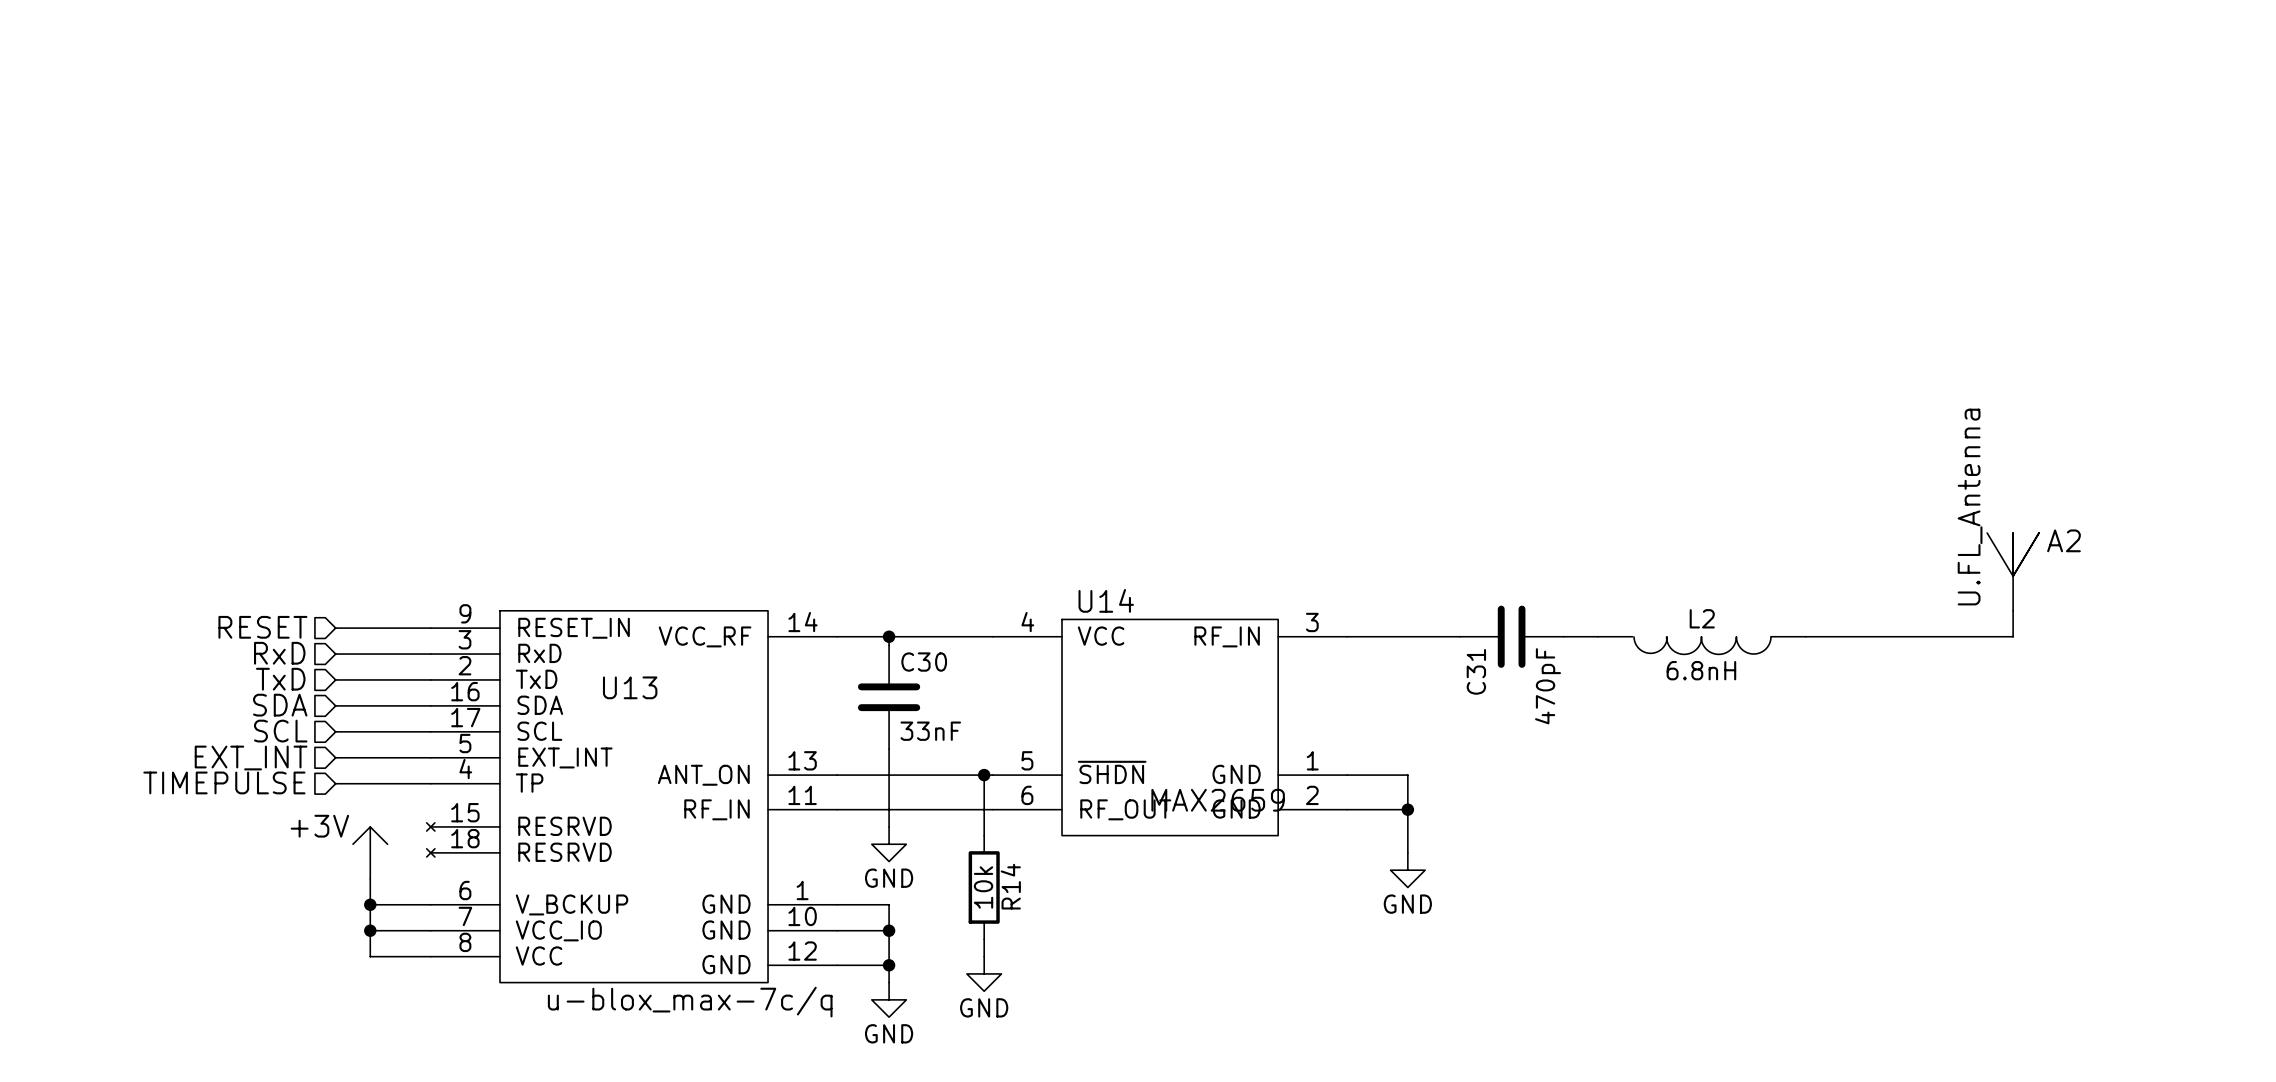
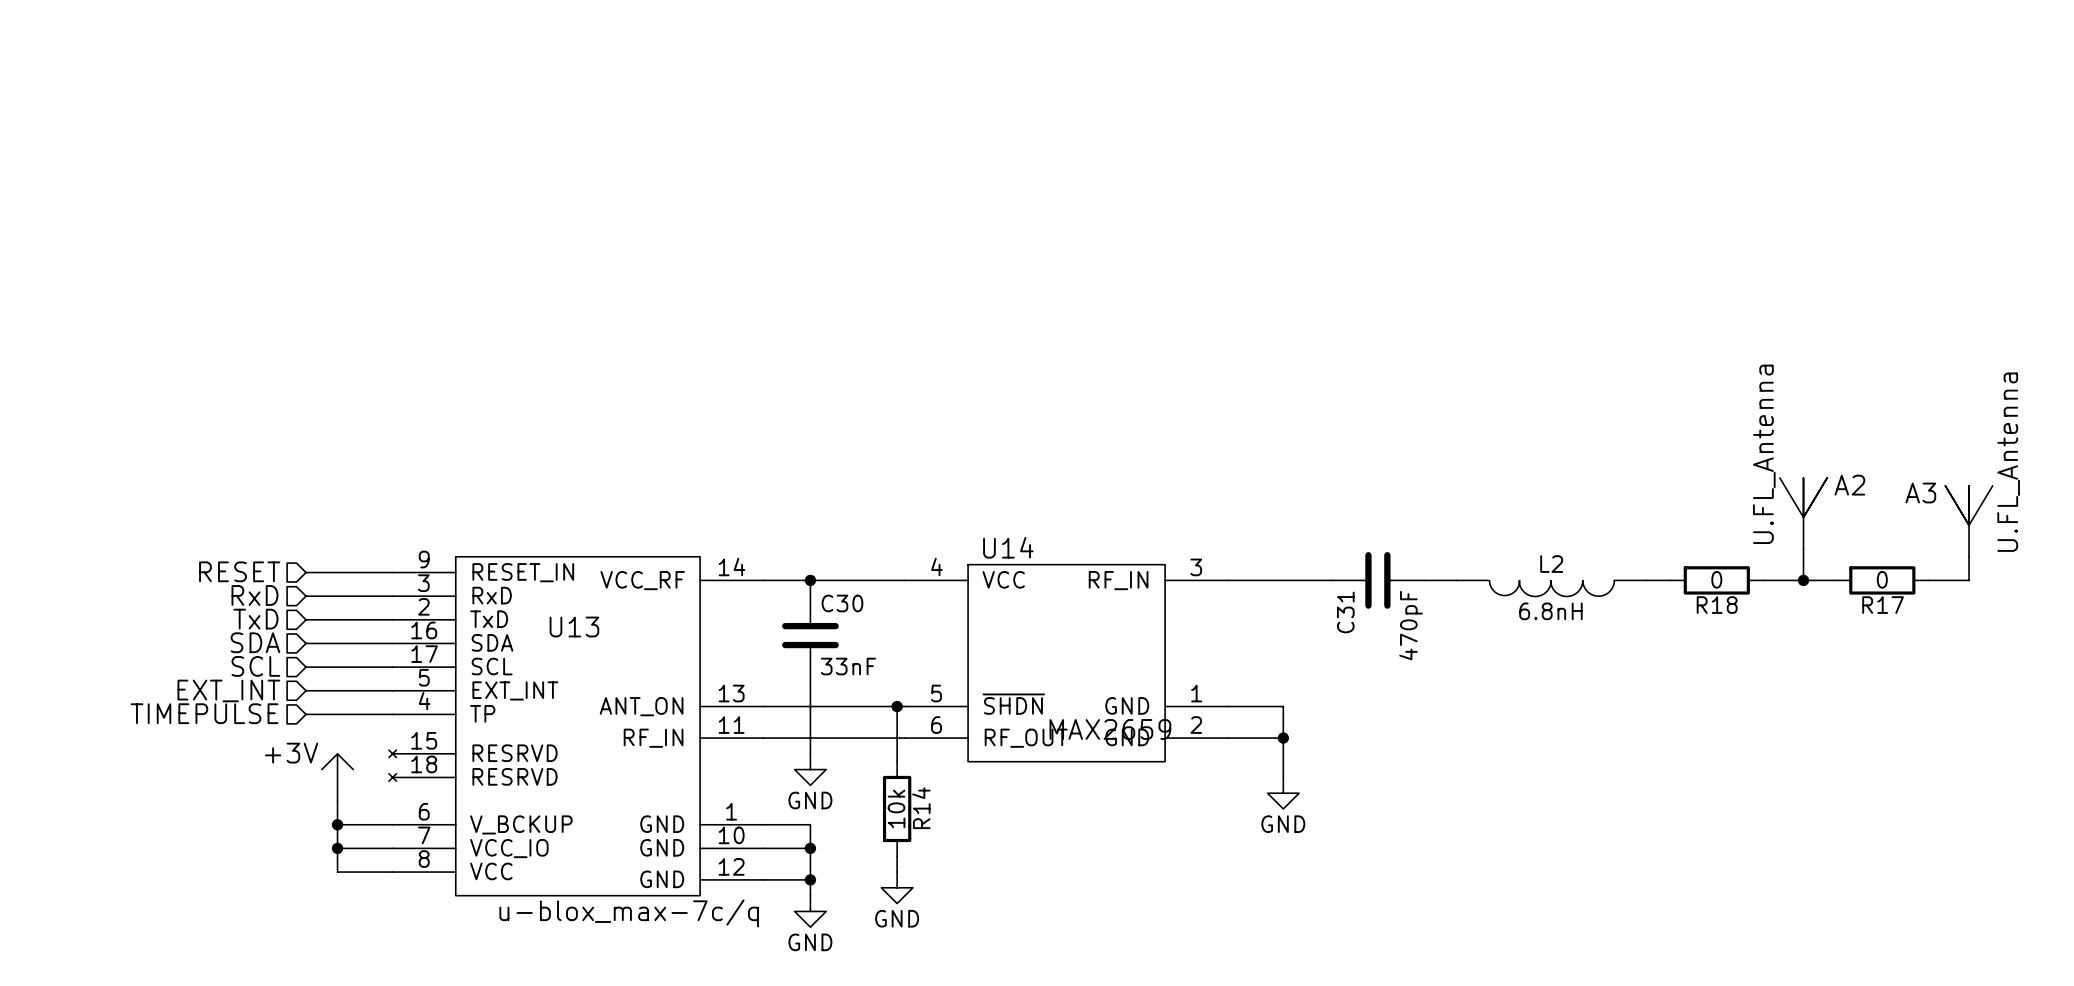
A2 position: (2013, 571) -> (1803, 513)
A3: none -> U.FL_Antenna (1969, 521)
wire: none -> (1803, 548) (1803, 580)
wire: (2013, 610) (2013, 636) -> none
wire: none -> (1969, 556) (1969, 580) (1929, 580)
wire: (1831, 636) (1935, 636) -> none
R18: none -> 0 (1716, 580)
junction: none -> (1803, 580)
R17: none -> 0 (1882, 580)

